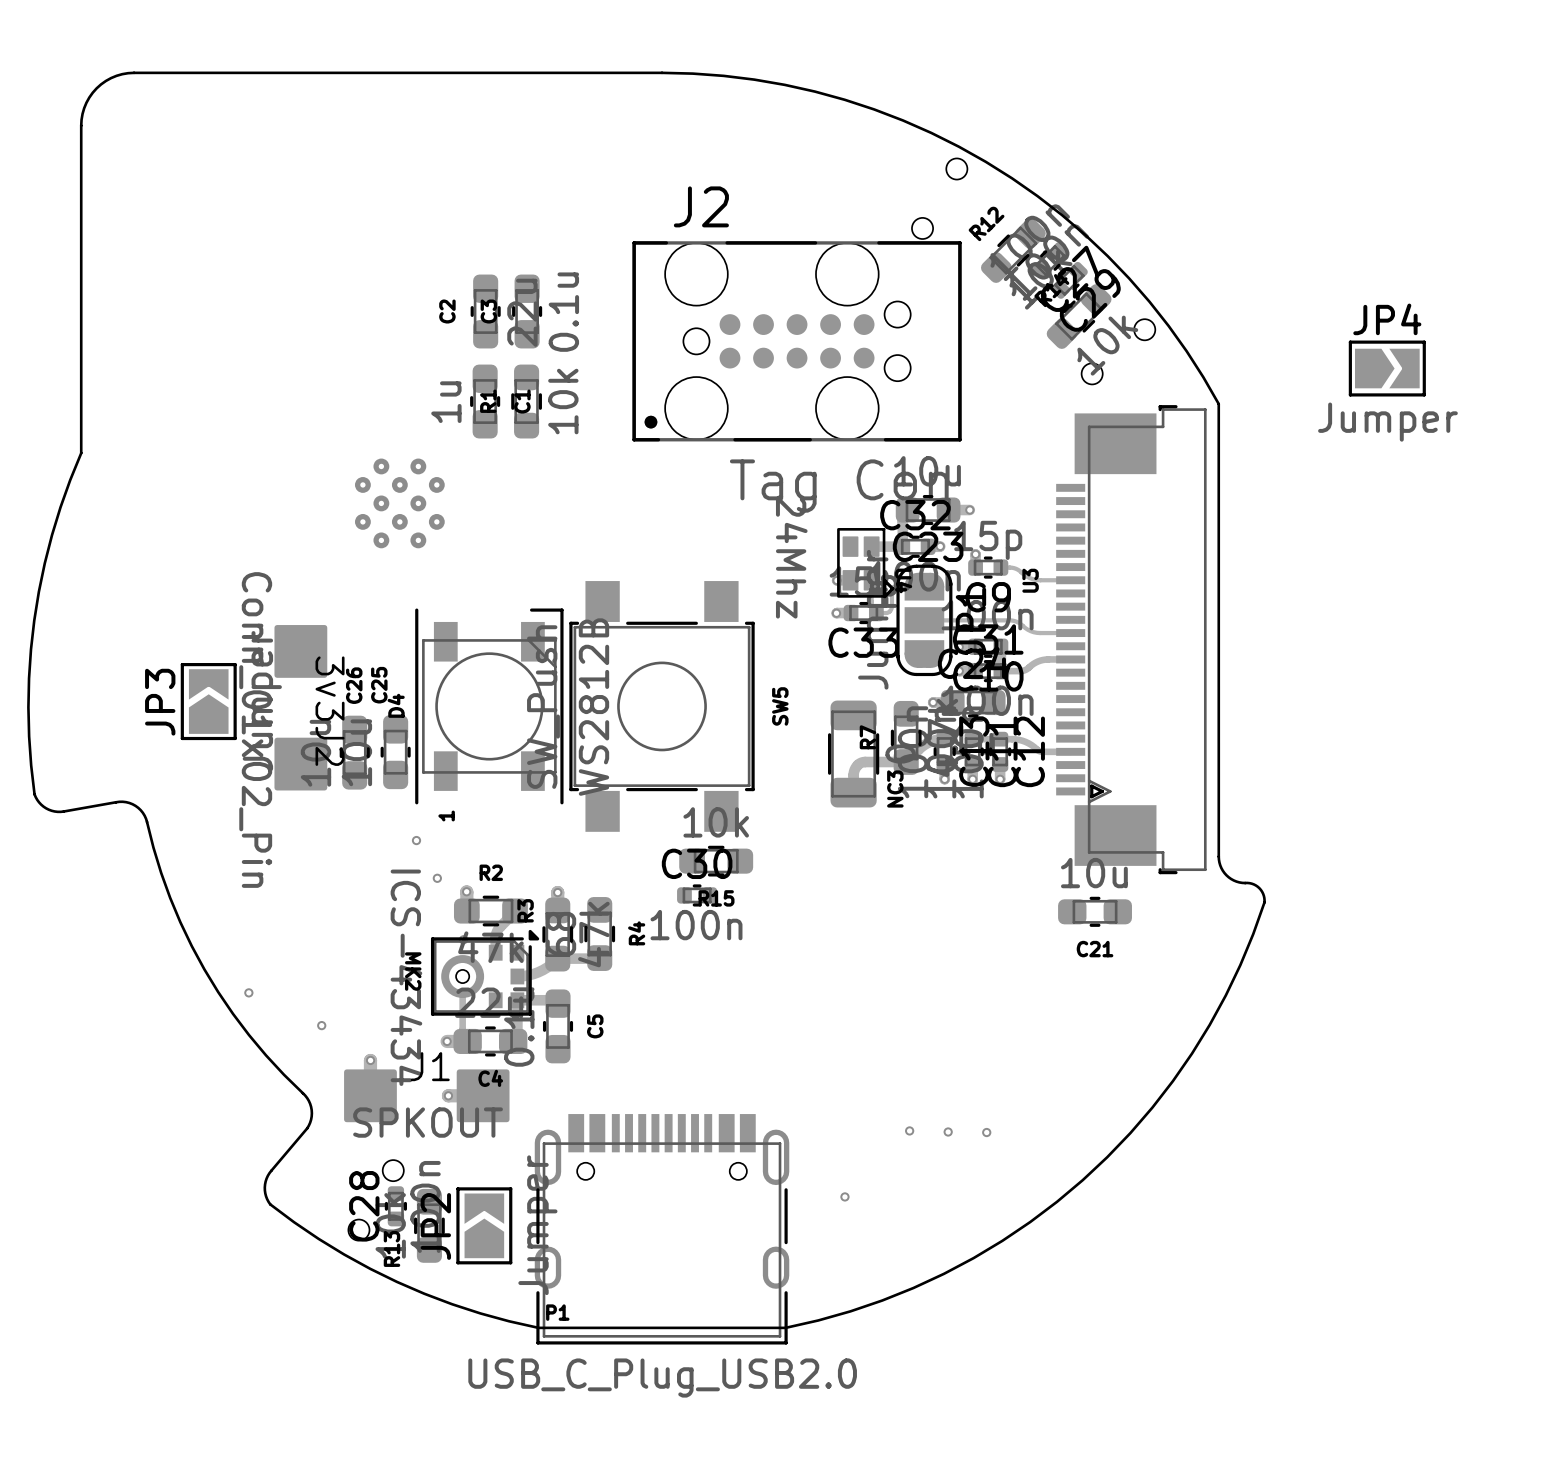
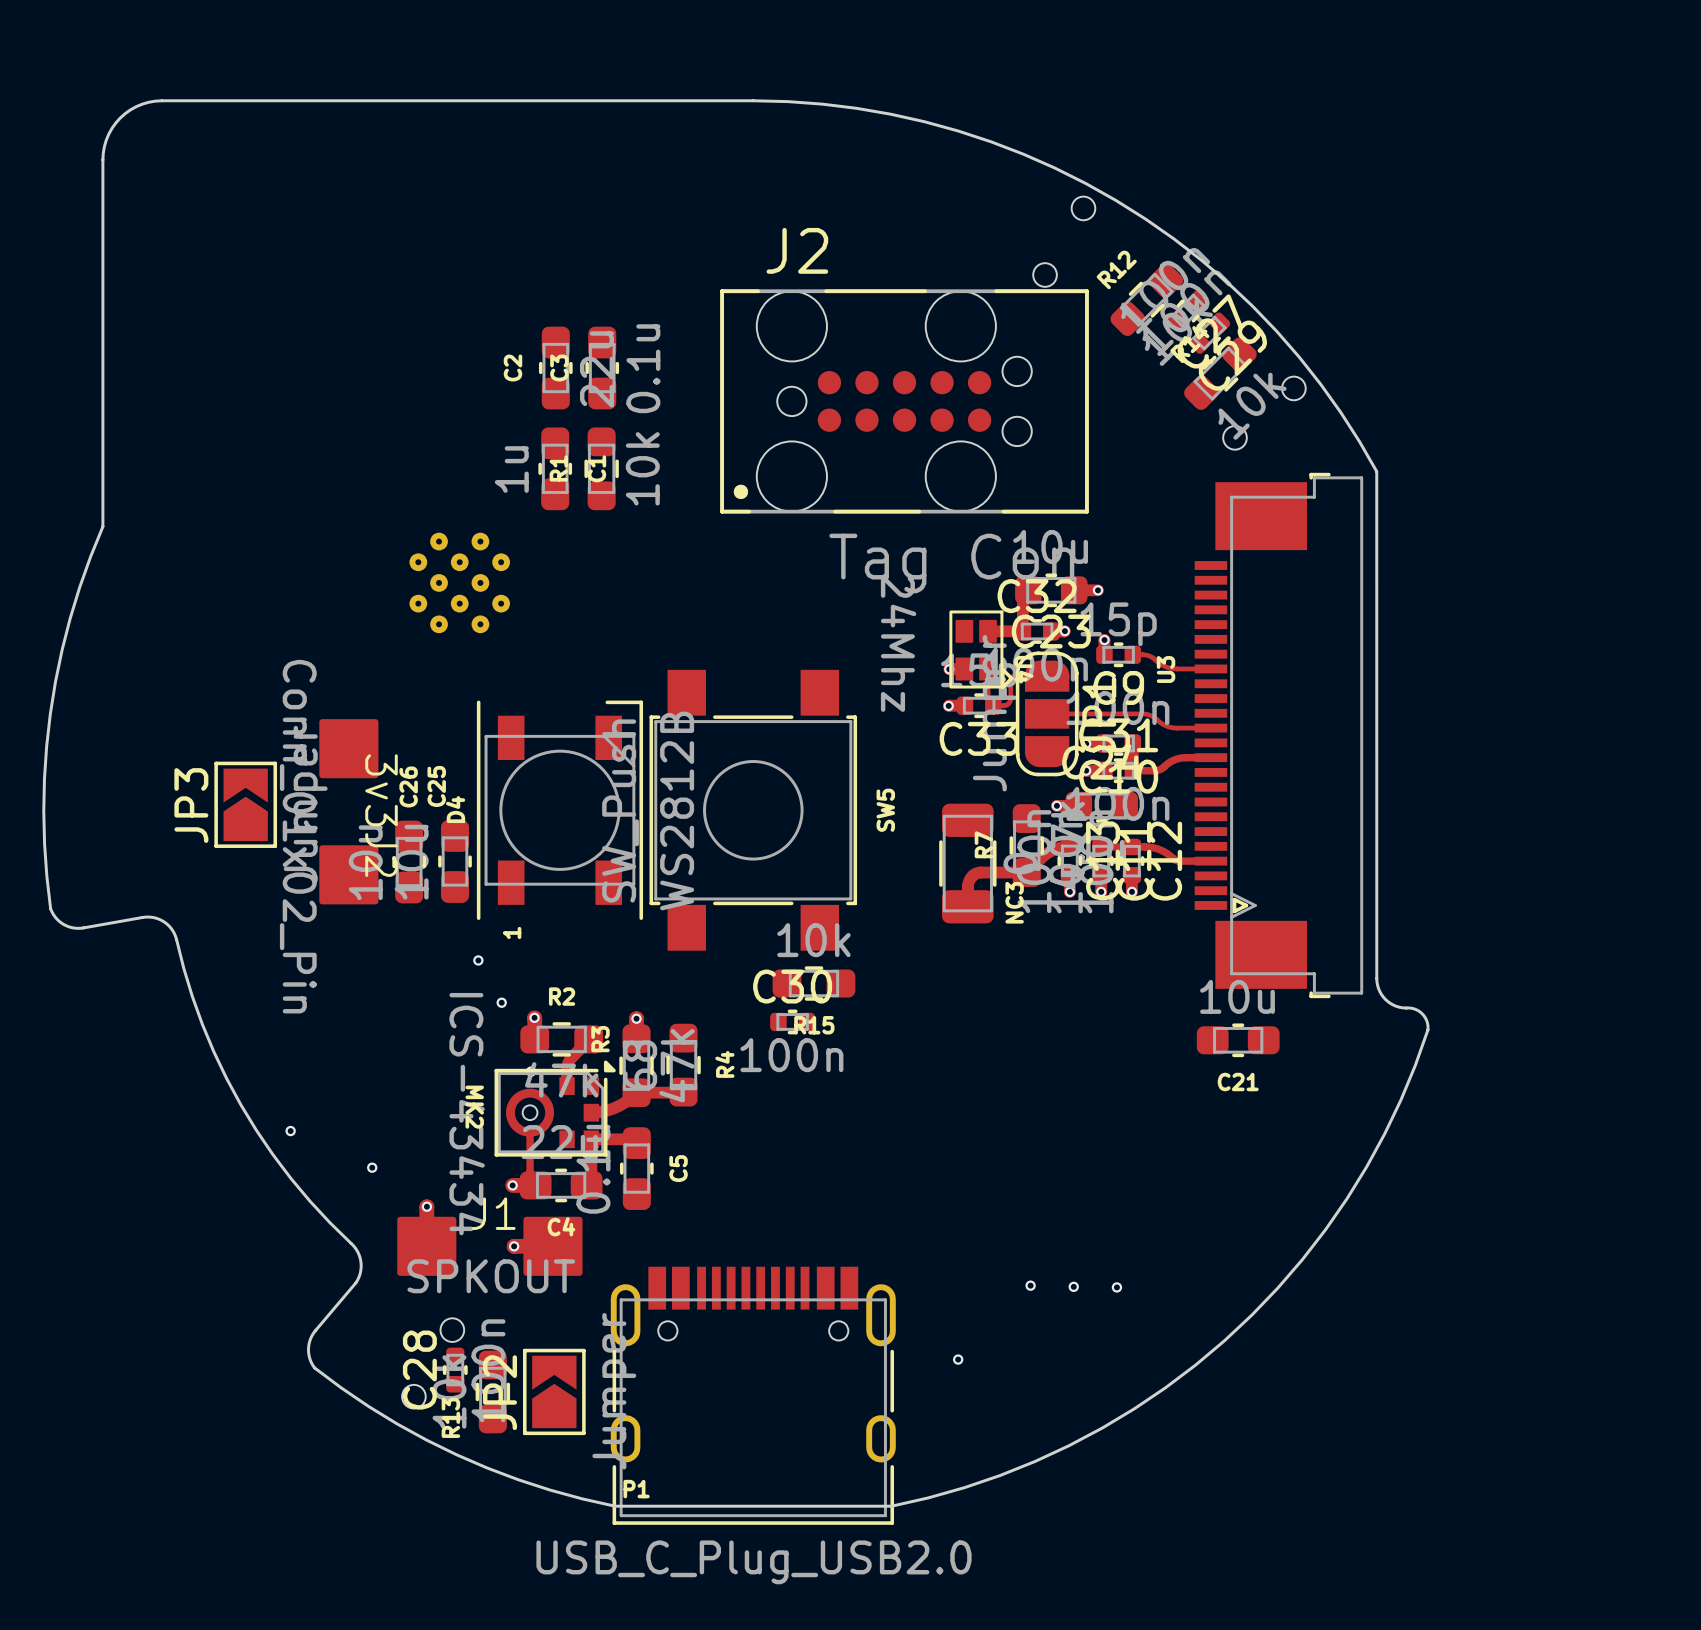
JP4: Jumper (1387, 368) -> none

